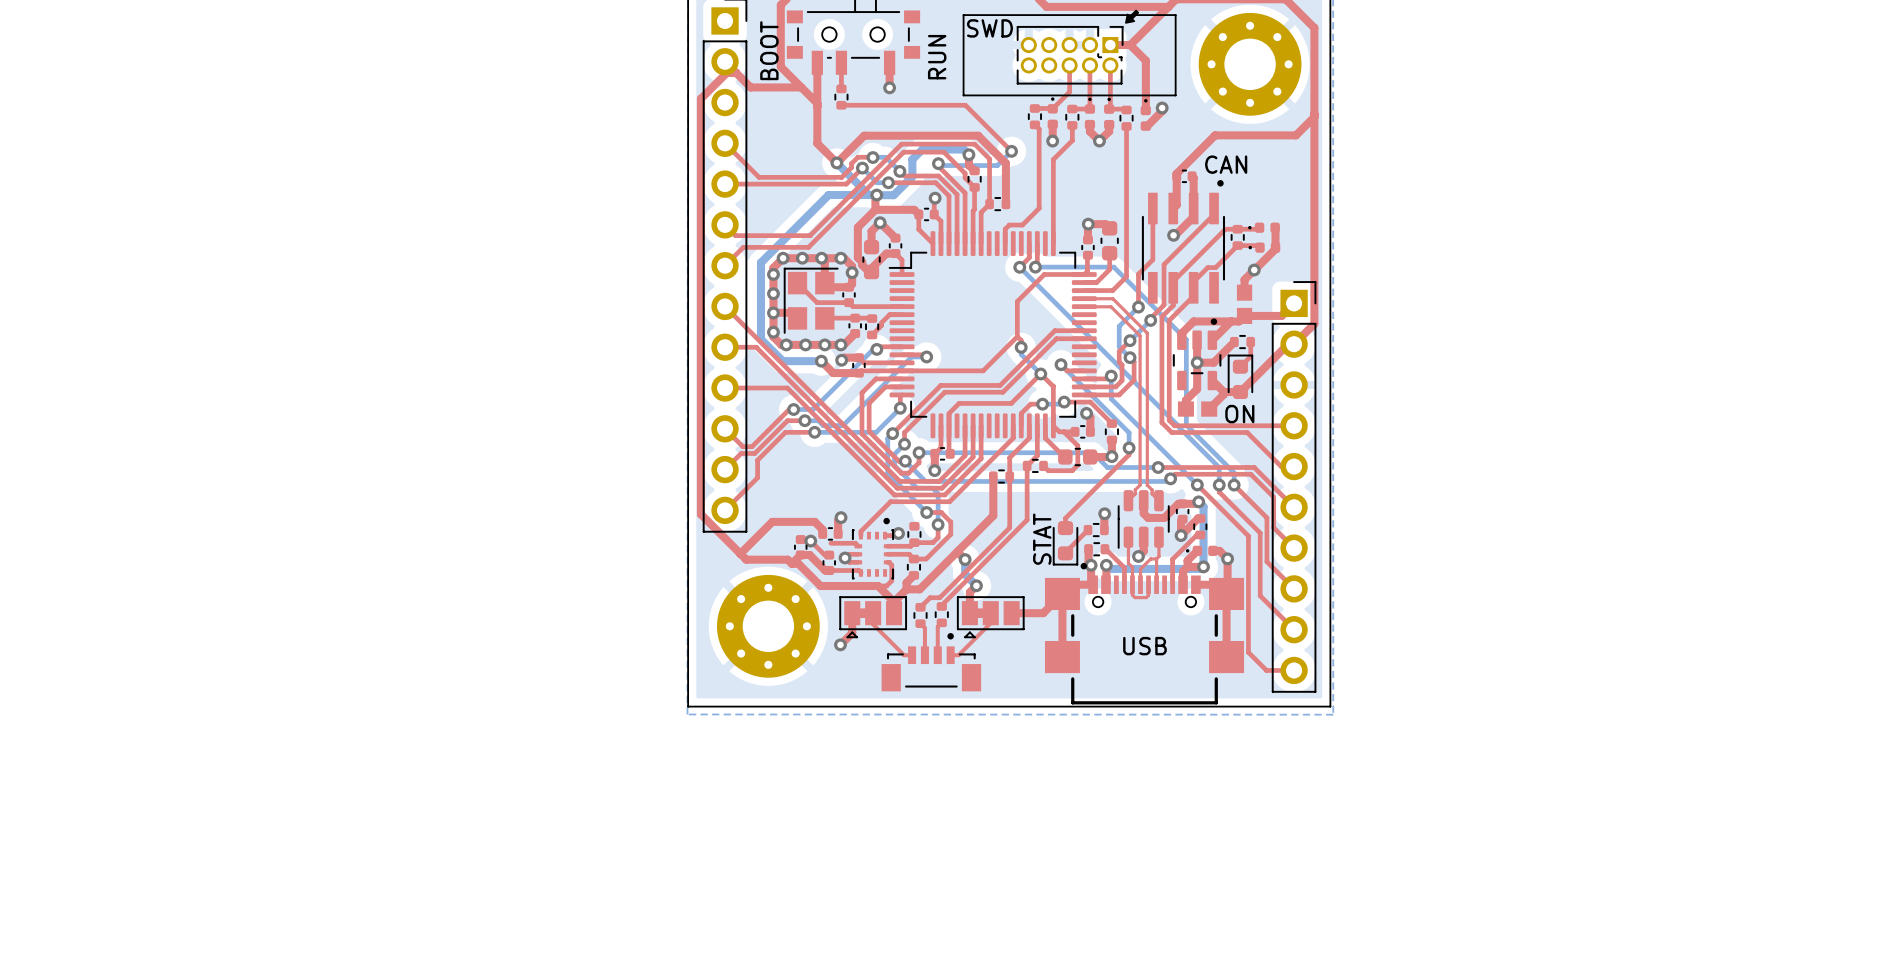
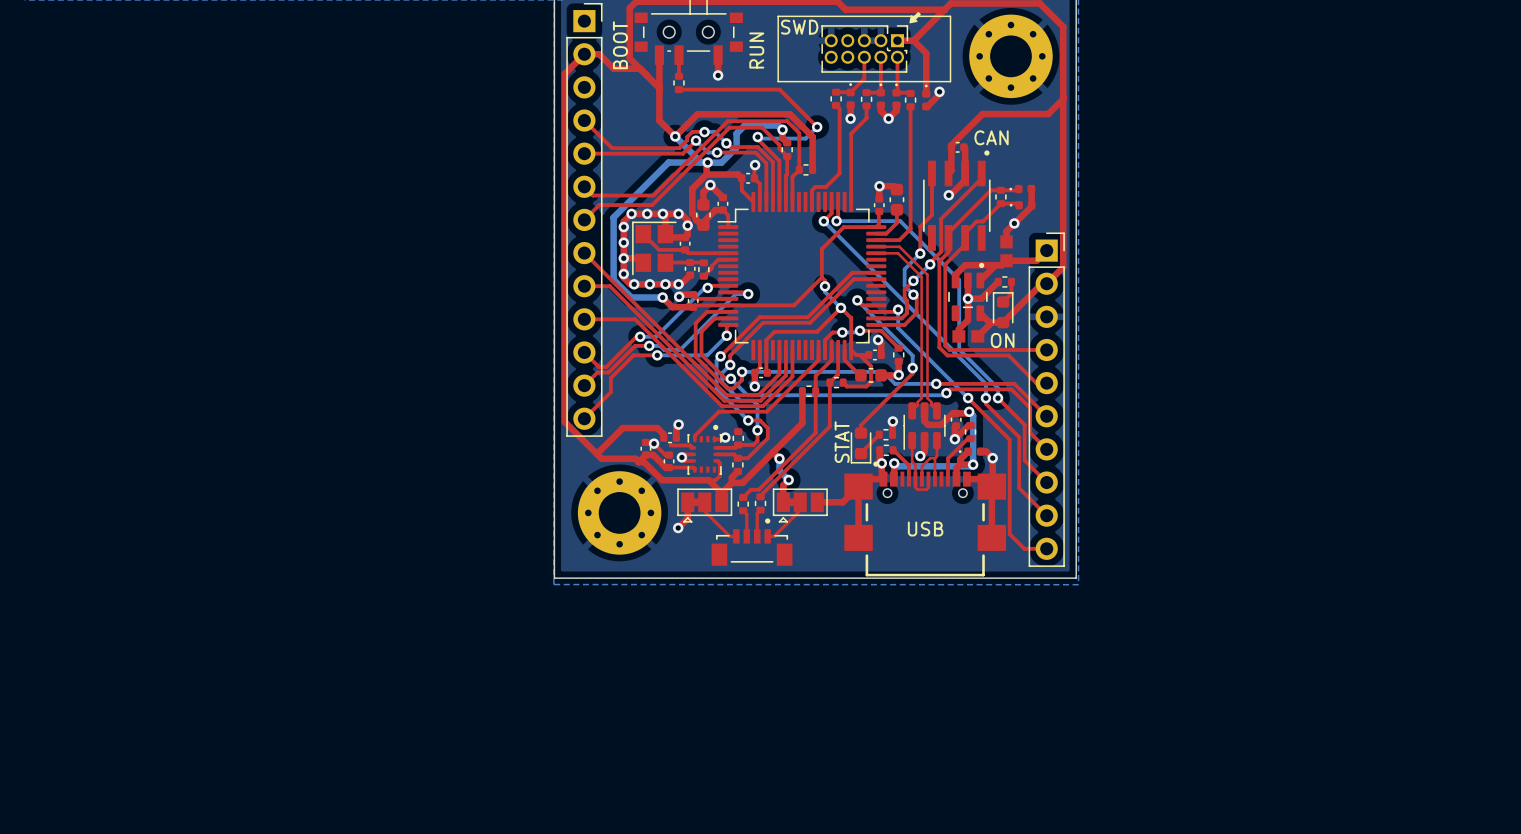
top track: (725, 61) (750, 87) (801, 87) -> none
top track: (736, 72) (726, 72) (700, 98) -> (640, 68) (613, 68) (599, 54) (584, 54) (564, 73) (564, 84)

